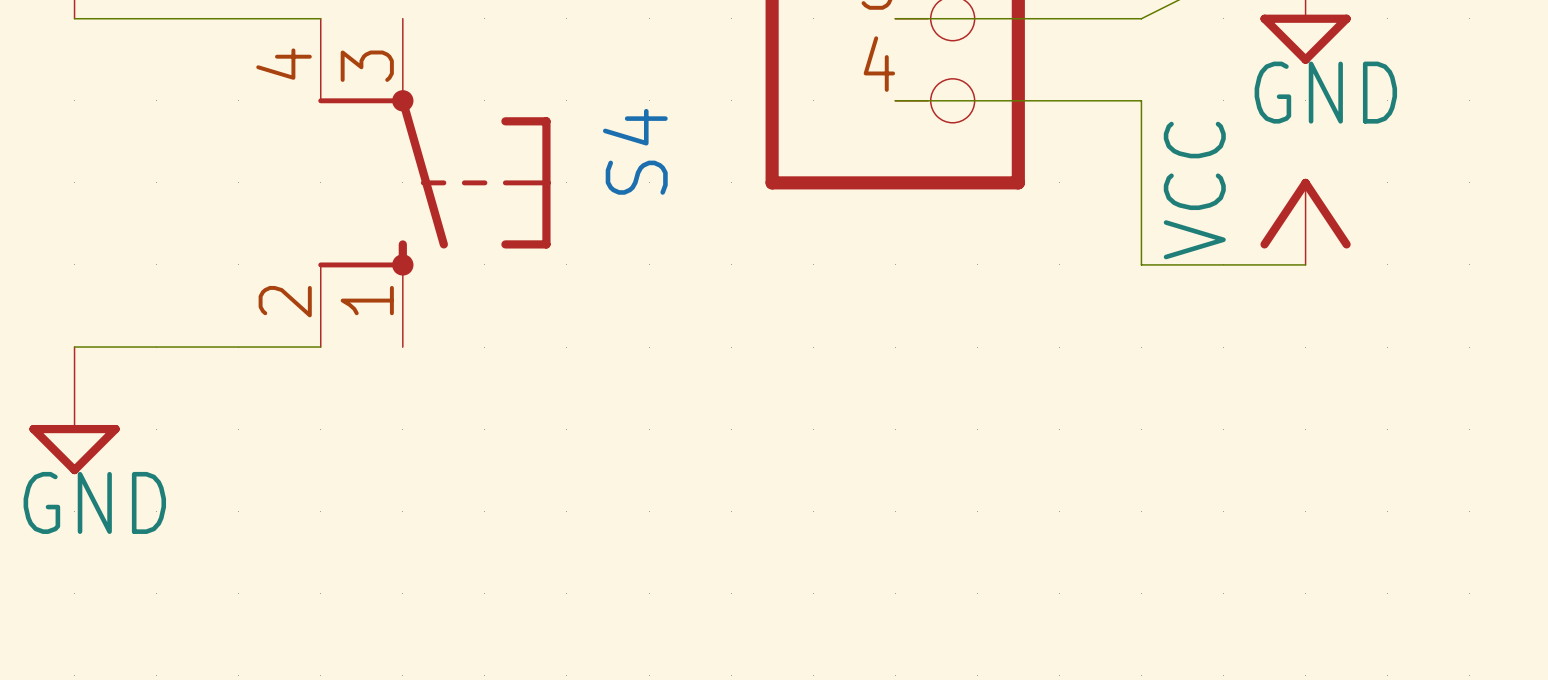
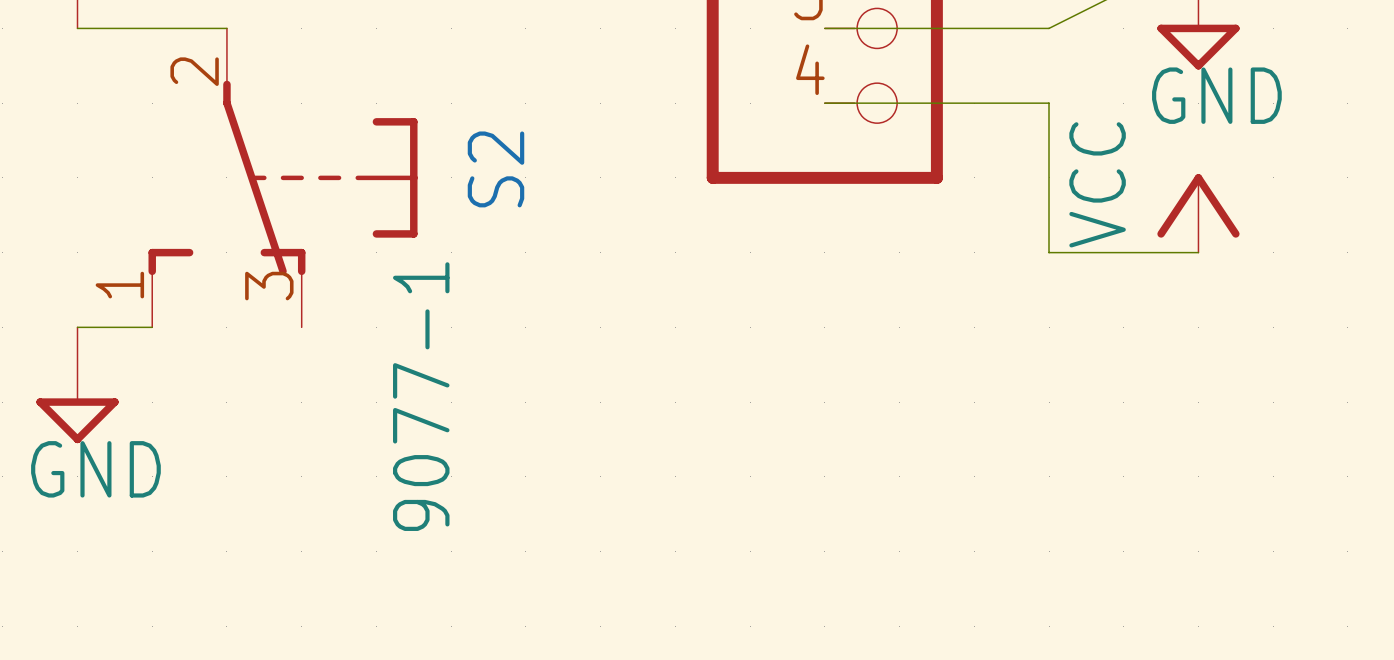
wire: (238, 18) (320, 18) -> none
S2: none -> 9077-1 (283, 177)
S4: (434, 182) -> none
wire: (156, 347) (320, 347) -> none

